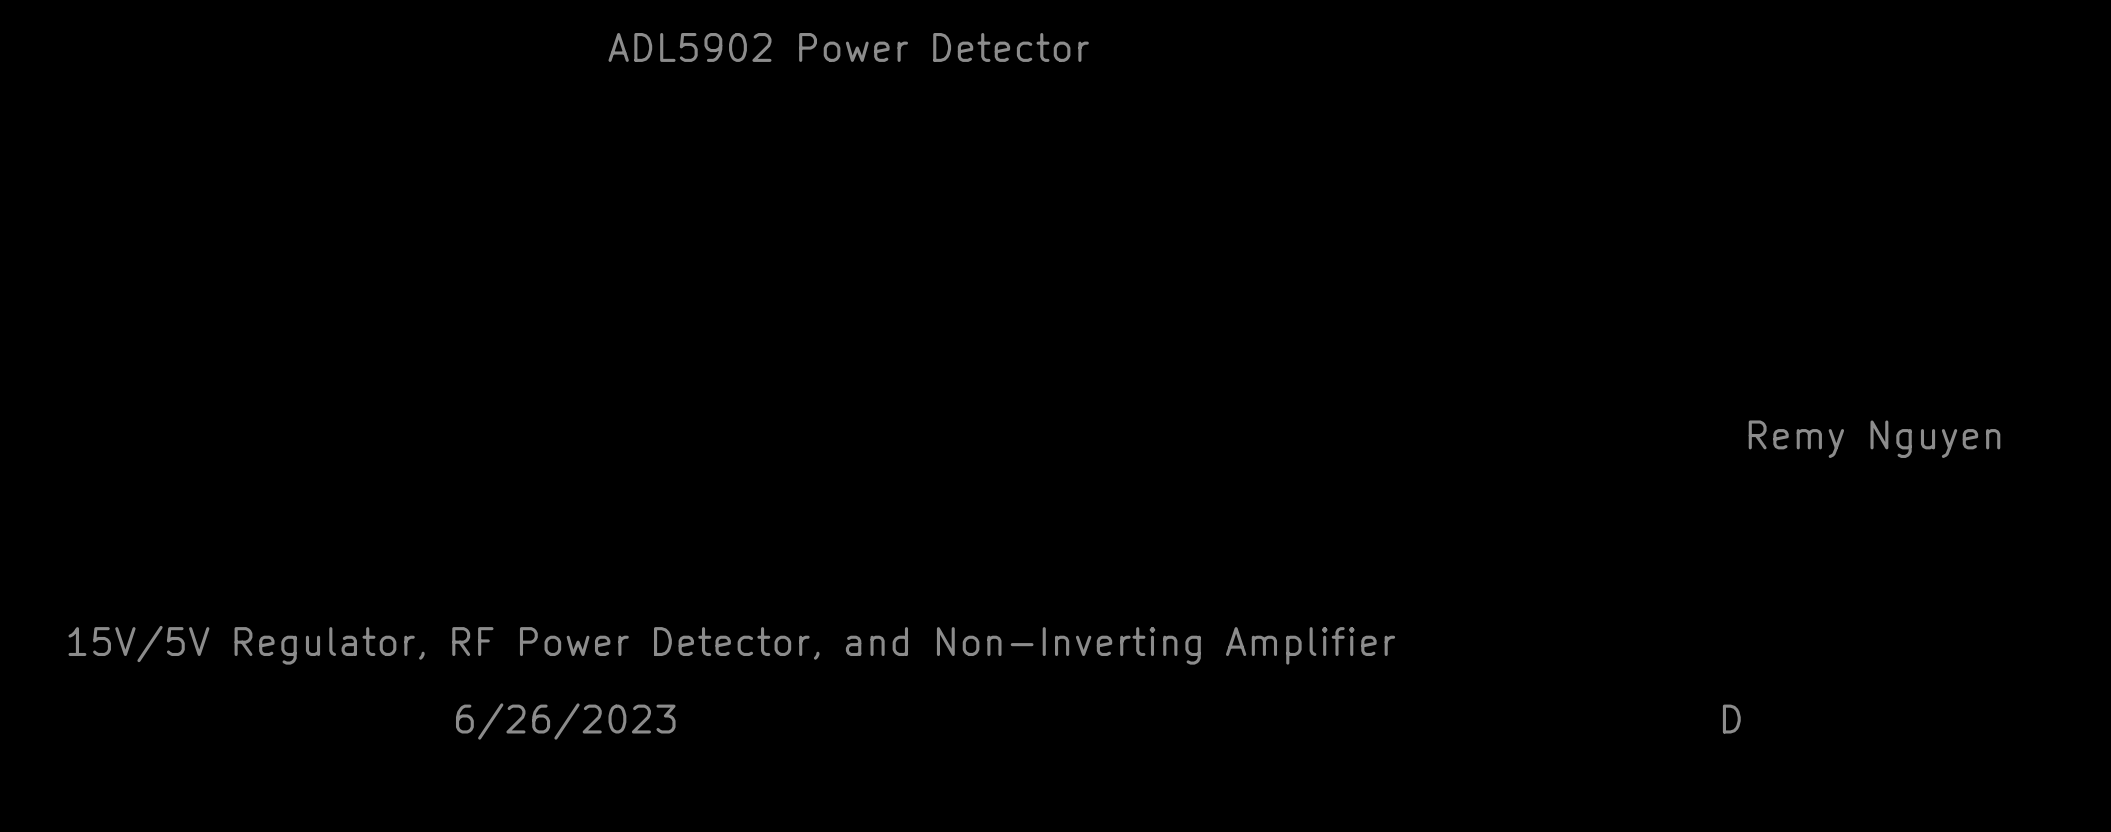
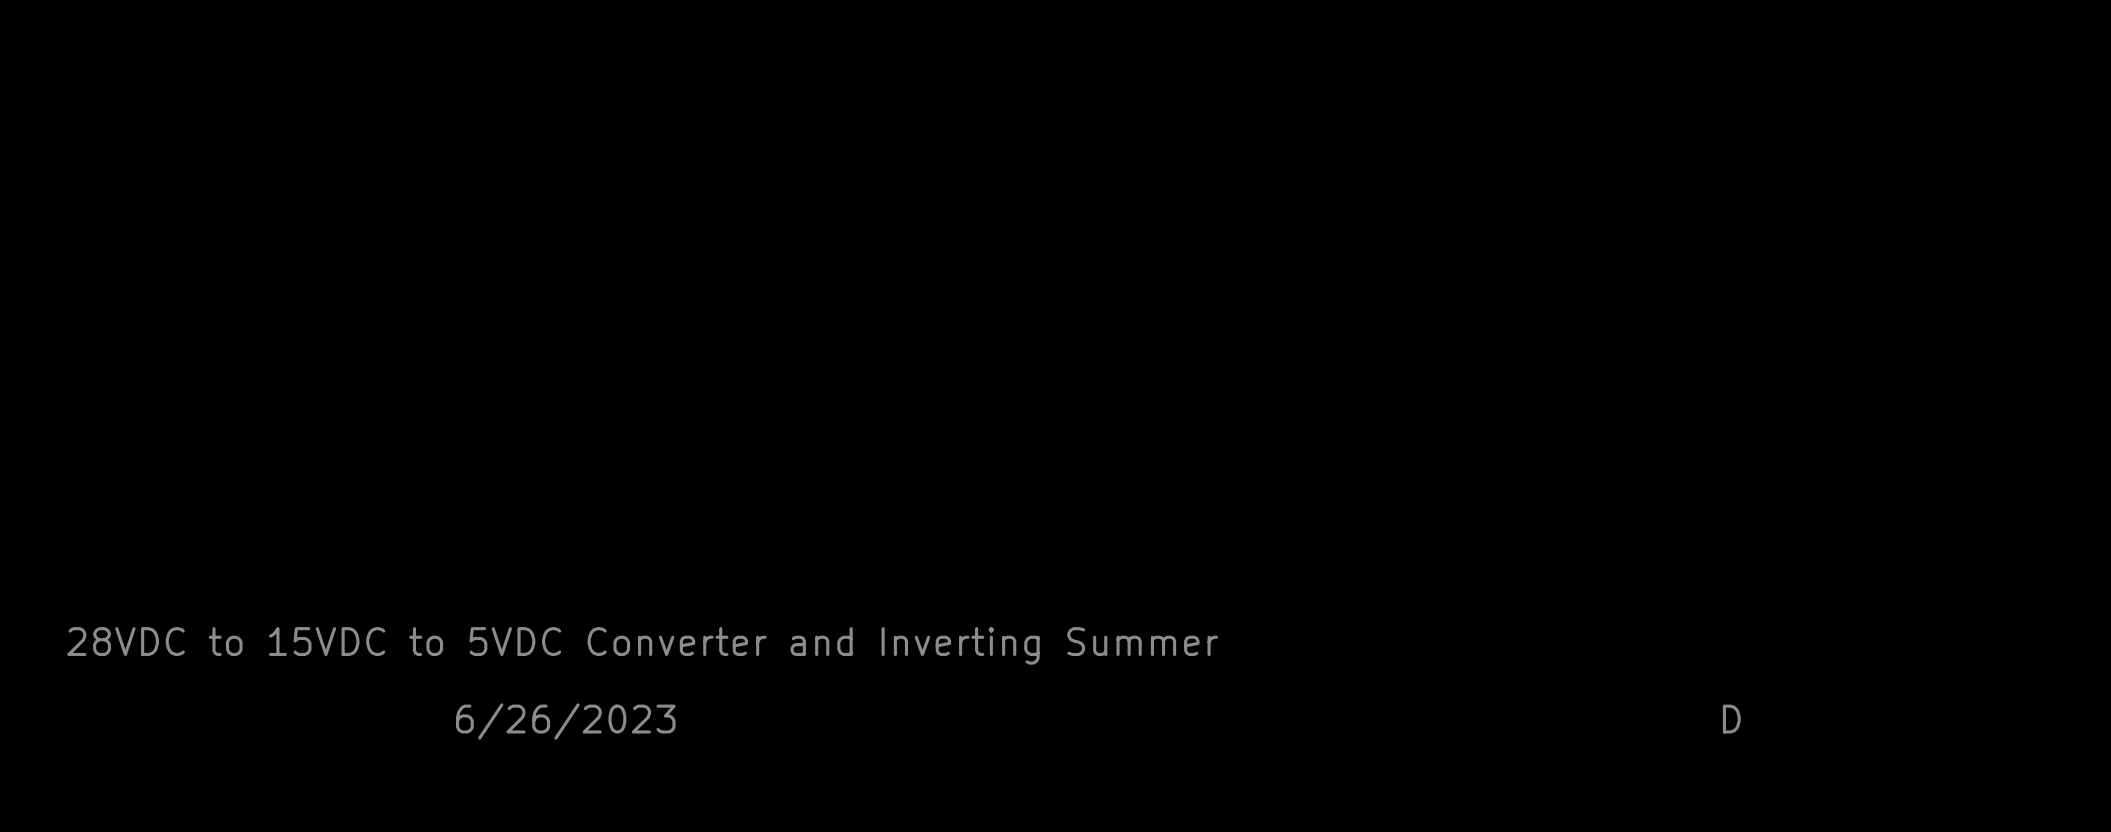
text: ADL5902 Power Detector (848, 47) -> none
text: Remy Nguyen (1874, 439) -> none
text: 15V/5V Regulator, RF Power Detector, and Non-Inverting Amplifier (731, 645) -> 28VDC to 15VDC to 5VDC Converter and Inverting Summer (642, 645)

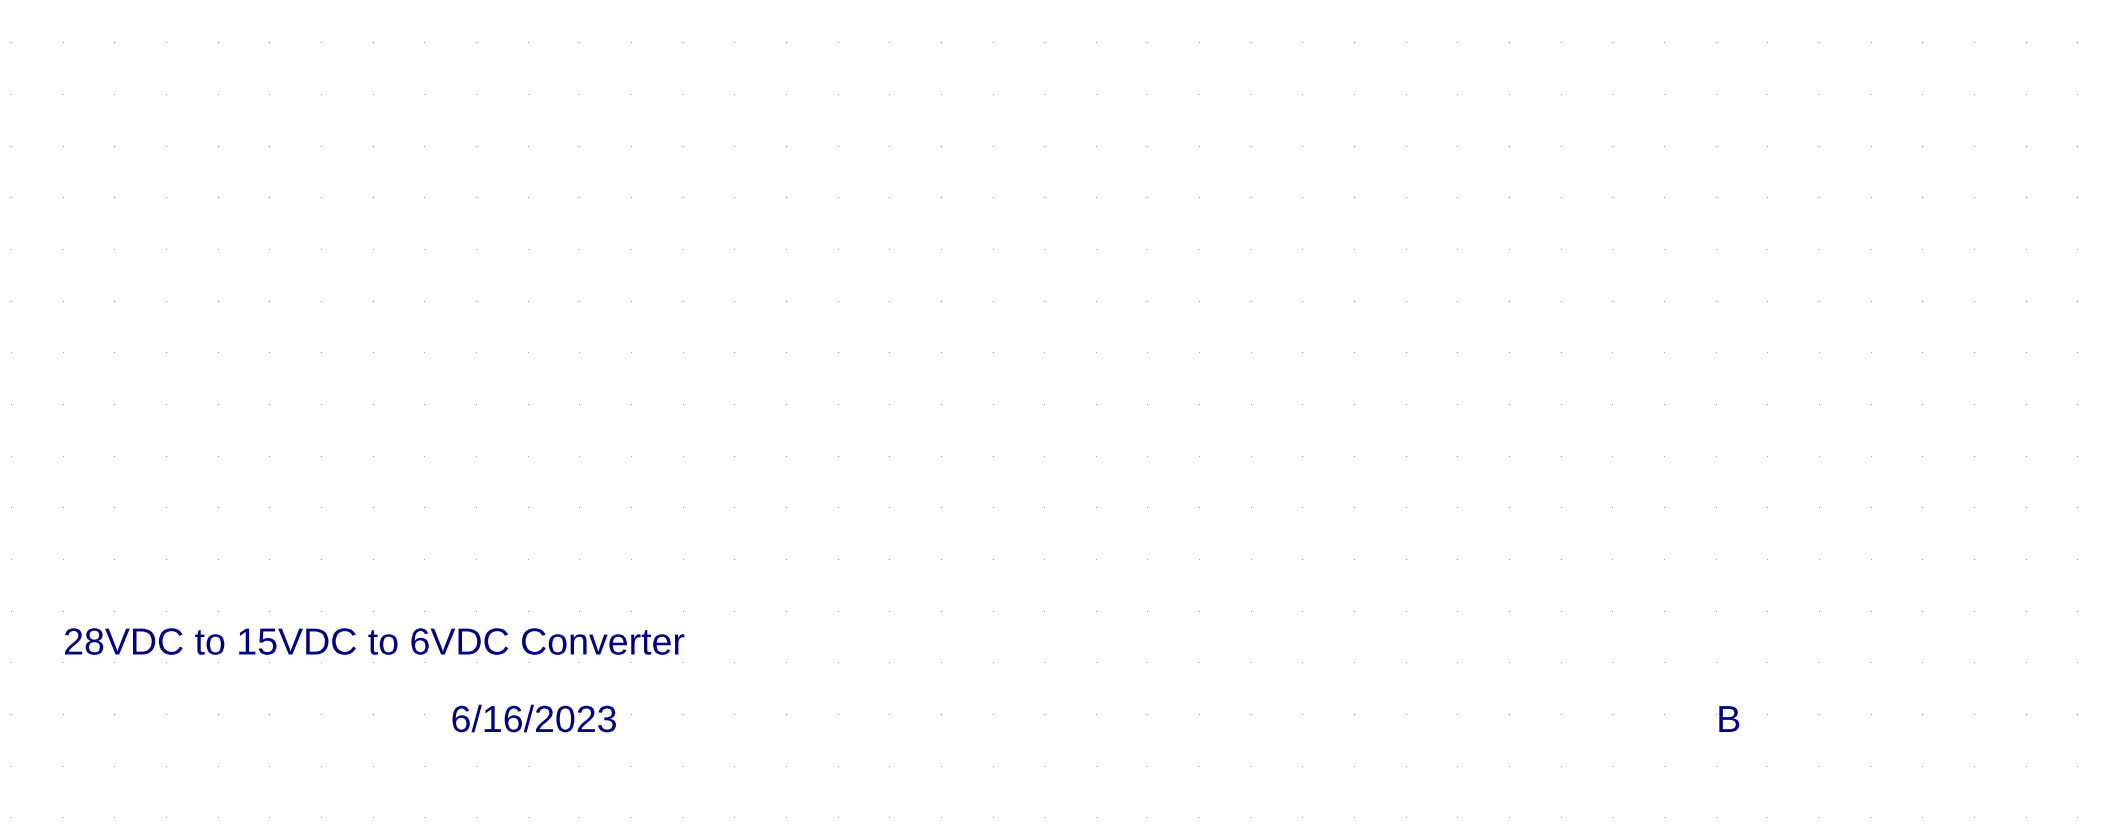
text: 28VDC to 15VDC to 5VDC Converter and Inverting Summer (642, 645) -> 28VDC to 15VDC to 6VDC Converter (374, 641)
text: D (1731, 719) -> B (1729, 719)
text: 6/26/2023 (565, 721) -> 6/16/2023 (534, 718)

